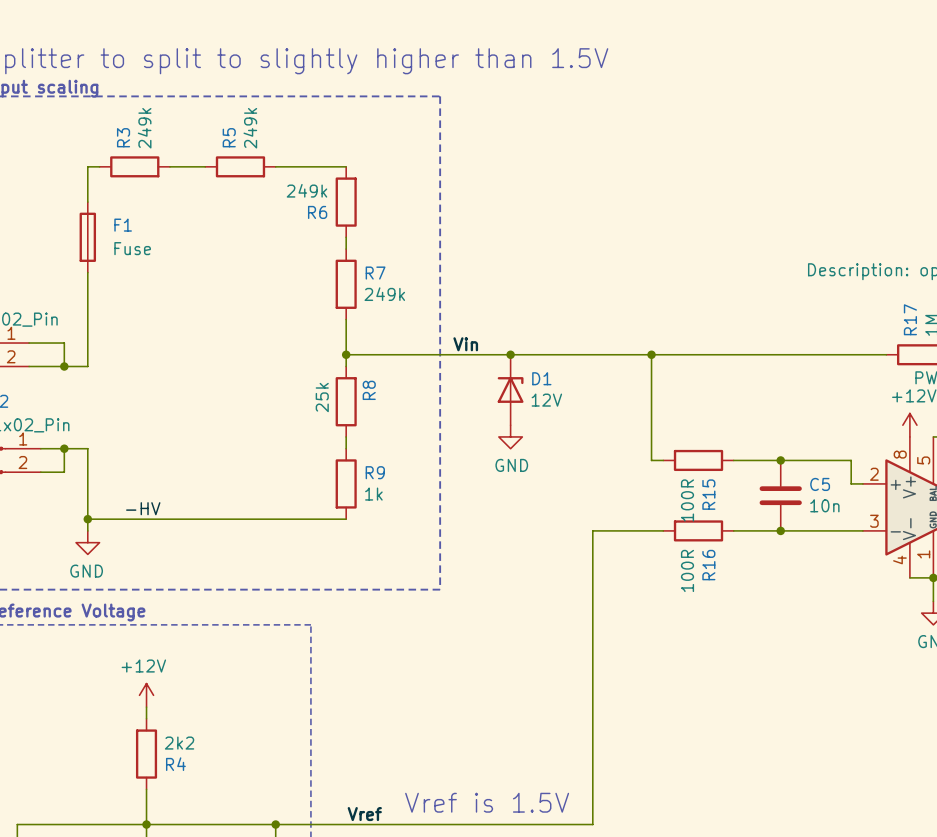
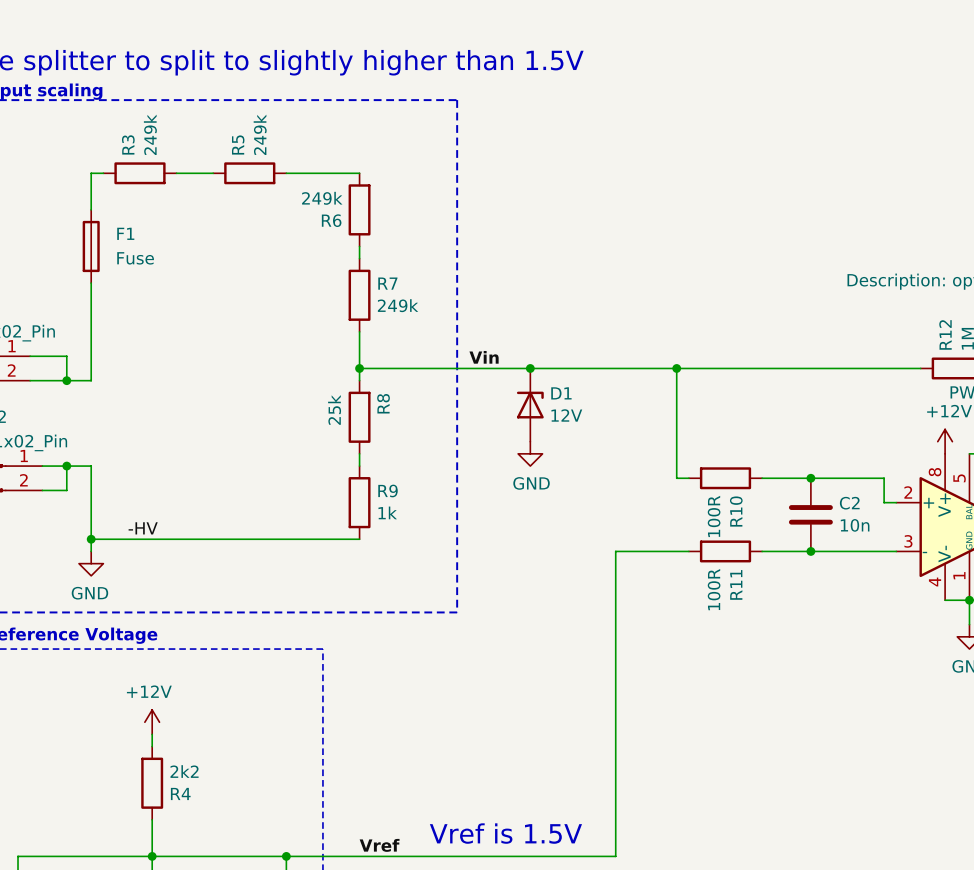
R17 name: R17 (910, 319) -> R12 (945, 334)
C5 name: C5 (820, 484) -> C2 (849, 503)
R15 name: R15 (708, 494) -> R10 (736, 511)
R16 name: R16 (708, 565) -> R11 (736, 584)

